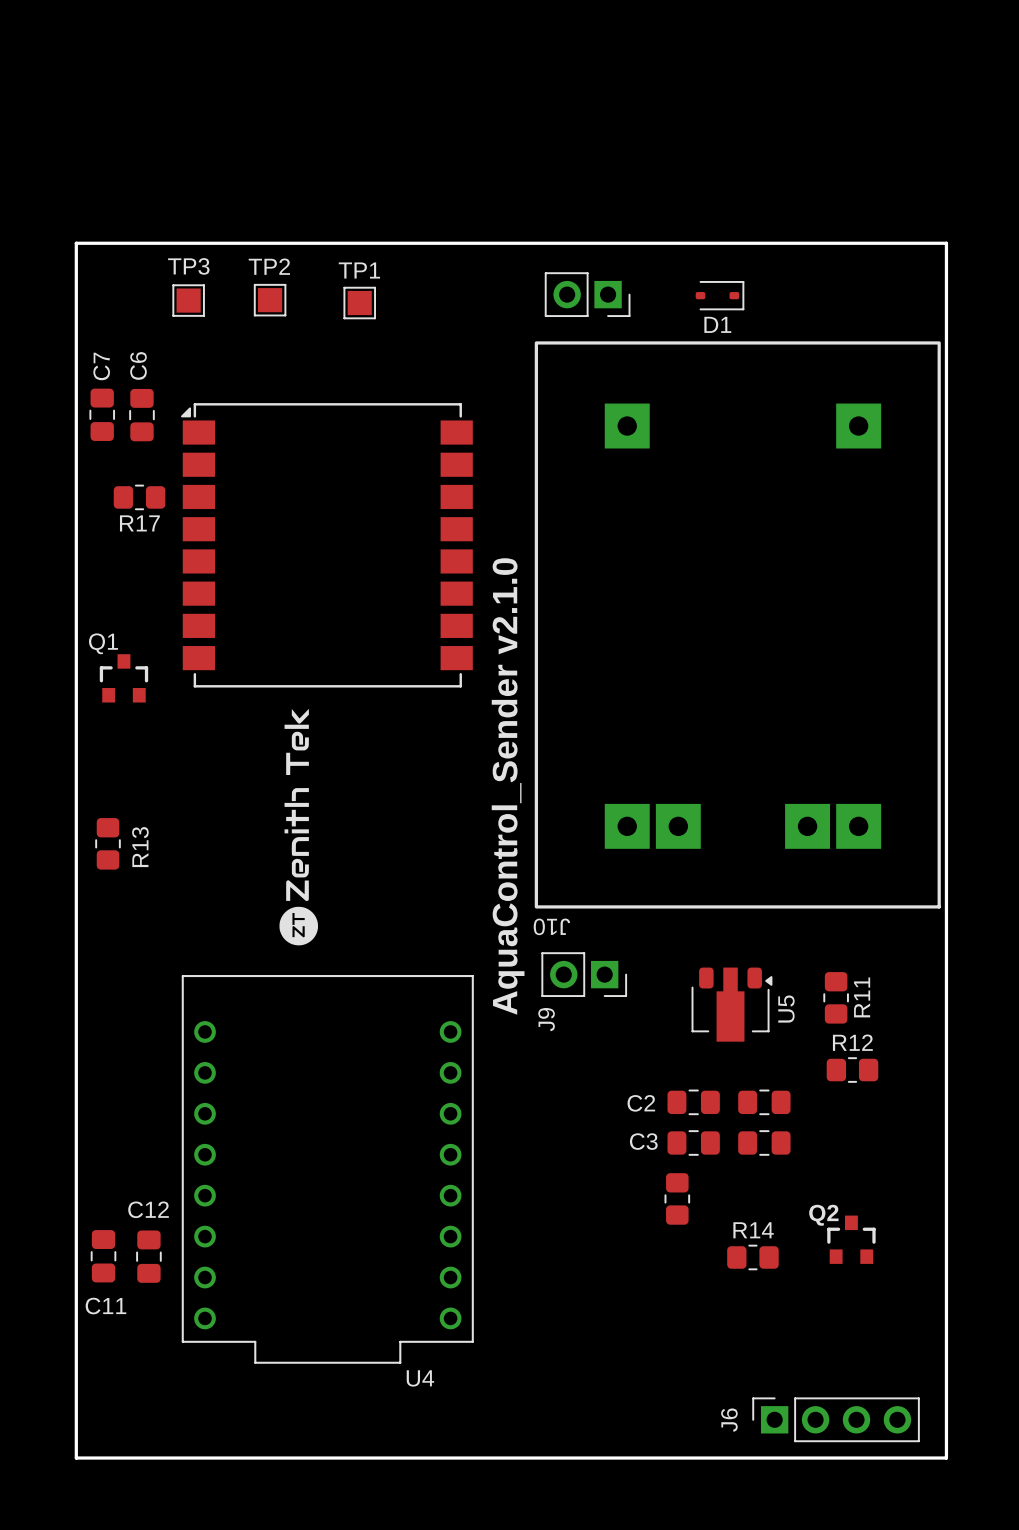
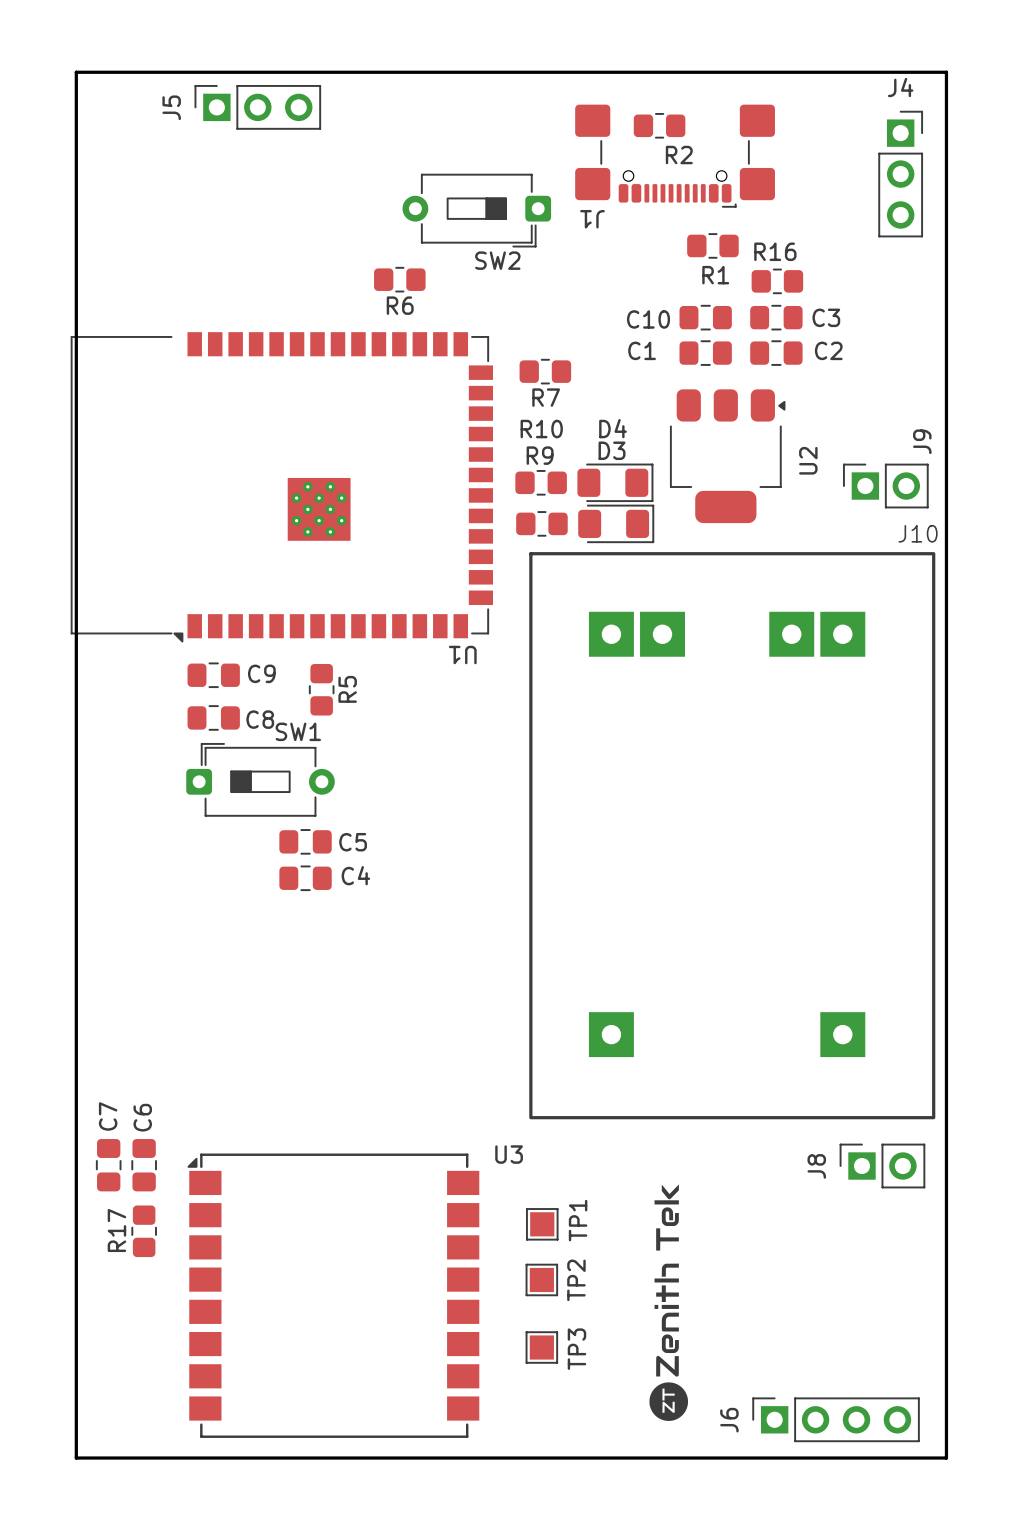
J5: none -> (257, 107)
R2: none -> (659, 125)
J1: none -> (675, 156)
J4: none -> (900, 174)
SW2: none -> (476, 210)
board edge: (76, 243) (946, 243) -> (76, 243) (76, 72) (946, 72) (946, 243)
R1: none -> (712, 245)
TP3 name rotation: 0° (188, 266) -> 90° counterclockwise (576, 1349)
TP2 name rotation: 0° (269, 266) -> 90° counterclockwise (576, 1280)
TP1 name rotation: 0° (359, 270) -> 90° counterclockwise (578, 1220)
R6: none -> (399, 279)
R16: none -> (777, 281)
part: (587, 294) -> none
D1: (720, 295) -> none
TP3 position: (188, 300) -> (541, 1347)
TP2 position: (270, 300) -> (541, 1279)
TP1 position: (359, 303) -> (542, 1224)
C10: none -> (705, 317)
C1: none -> (705, 353)
text: C6 (138, 365) -> none
R7: none -> (545, 371)
C7 position: (102, 414) -> (108, 1165)
part: (141, 415) -> none
U2: none -> (727, 456)
R10: none -> (541, 482)
D4: none -> (615, 482)
U1: none -> (281, 487)
R17 rotation: 0° (139, 497) -> 90° clockwise (144, 1231)
R17 position: (139, 497) -> (144, 1231)
R9: none -> (541, 523)
D3: none -> (616, 523)
part: (326, 545) -> none
J10 rotation: 0° (737, 624) -> 180° (732, 835)
C9: none -> (213, 675)
Q1: (123, 678) -> none
R5: none -> (321, 689)
drawing: [279, 708, 319, 946] -> none
C8: none -> (213, 717)
SW1: none -> (260, 779)
text: AquaControl_Sender v2.1.0 (508, 786) -> none
C5: none -> (305, 841)
R13: (108, 843) -> none
C4: none -> (305, 878)
J9 rotation: 0° (584, 974) -> 180° (885, 486)
J9 position: (584, 974) -> (885, 486)
R11: (836, 997) -> none
U5: (731, 1004) -> none
R12: (852, 1070) -> none
C2 position: (693, 1102) -> (776, 353)
part: (764, 1102) -> none
C2 name position: C2 (641, 1103) -> C2 (828, 350)
C3 name position: C3 (643, 1141) -> C3 (826, 317)
C3 position: (693, 1142) -> (776, 317)
part: (764, 1142) -> none
C6: none -> (144, 1165)
J8: none -> (882, 1166)
U4: (327, 1169) -> none
drawing: none -> [649, 1184, 688, 1421]
part: (677, 1198) -> none
Q2: (851, 1239) -> none
C11: (103, 1256) -> none
C12: (148, 1256) -> none
R14: (752, 1257) -> none
U3: none -> (333, 1295)

